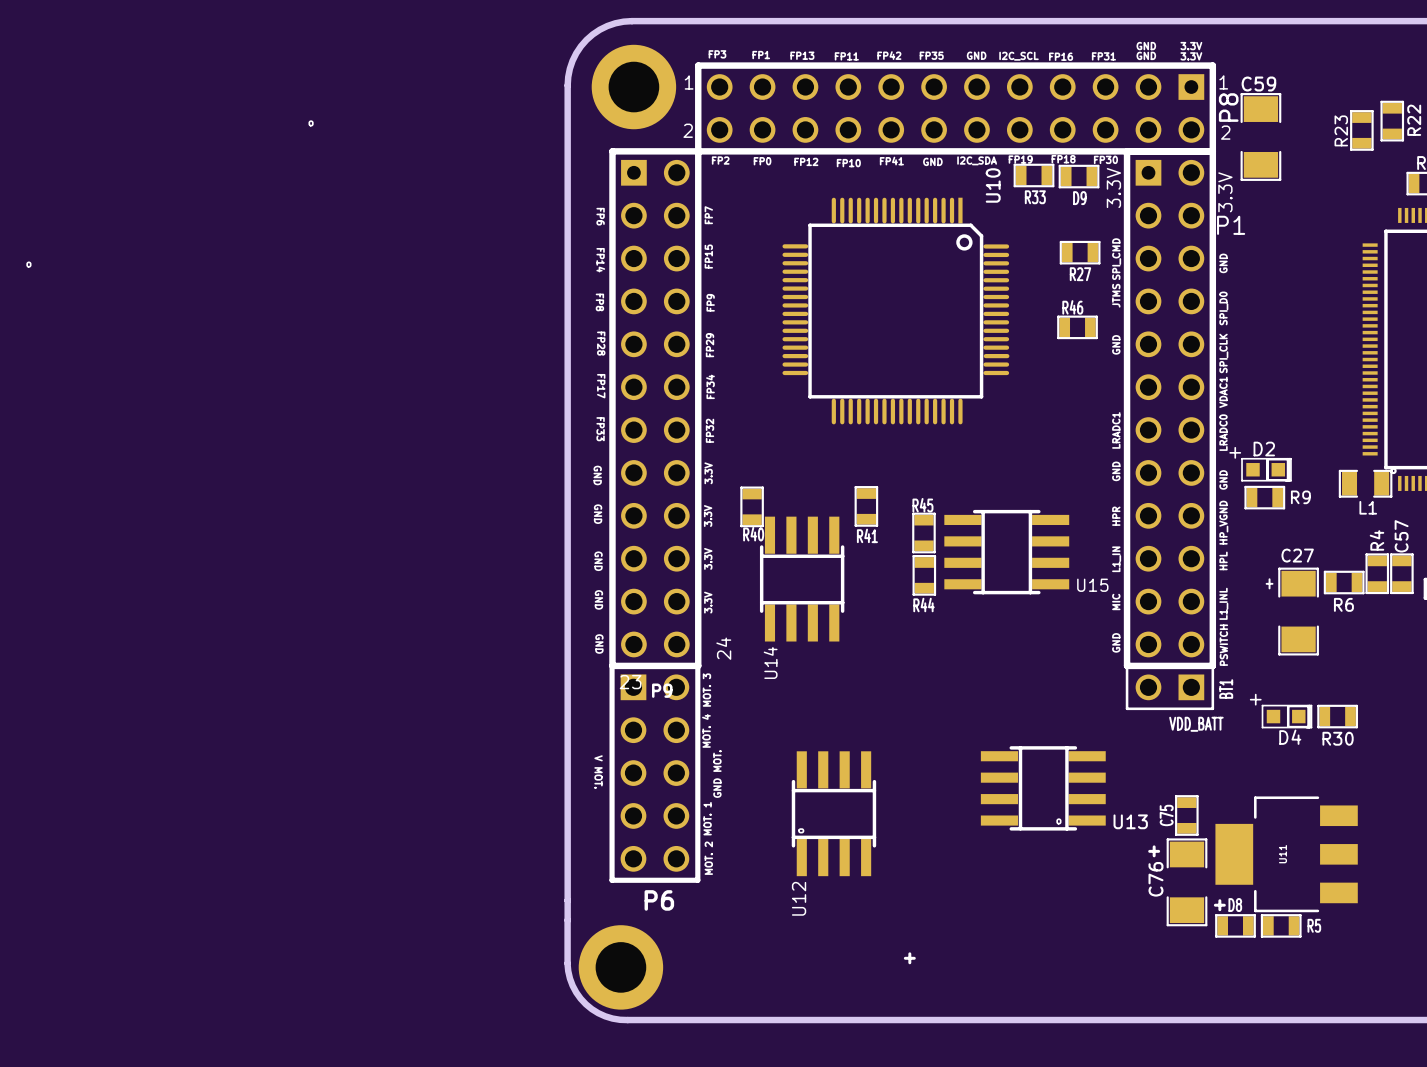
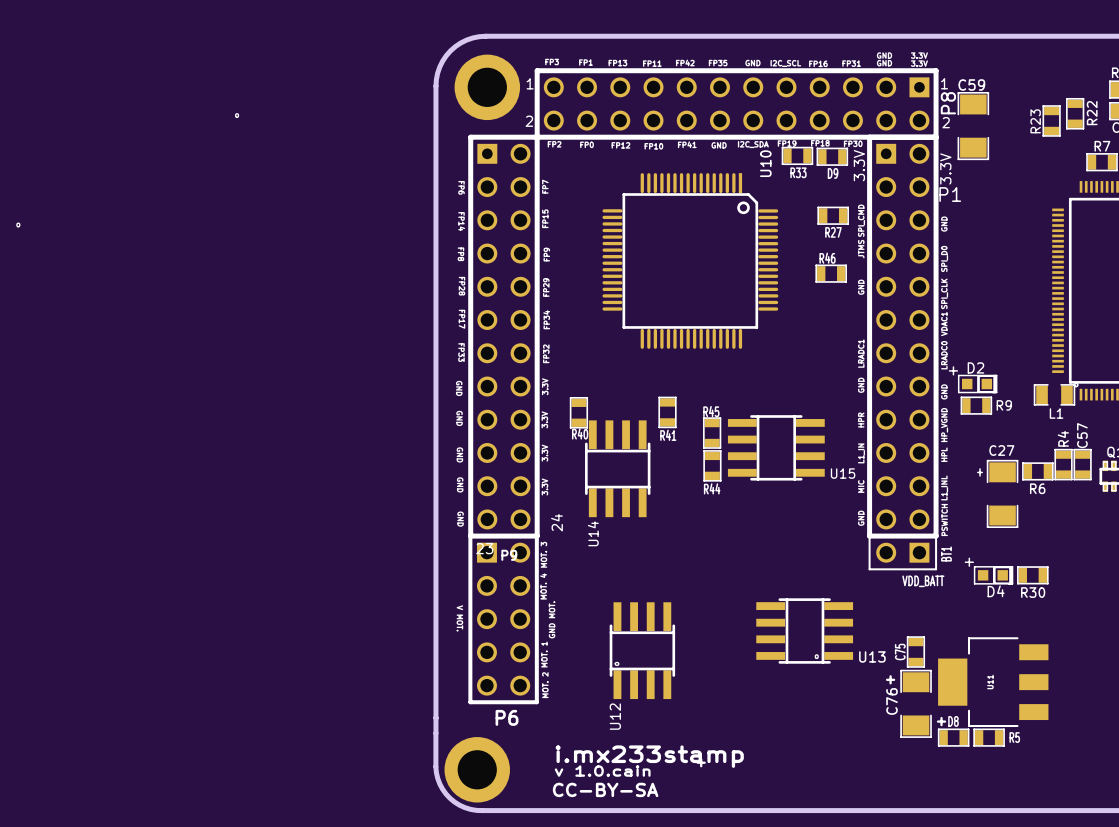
text: none -> i.mx233stamp (649, 756)
text: none -> v 1.0.cain (602, 771)
text: none -> CC-BY-SA (605, 789)

